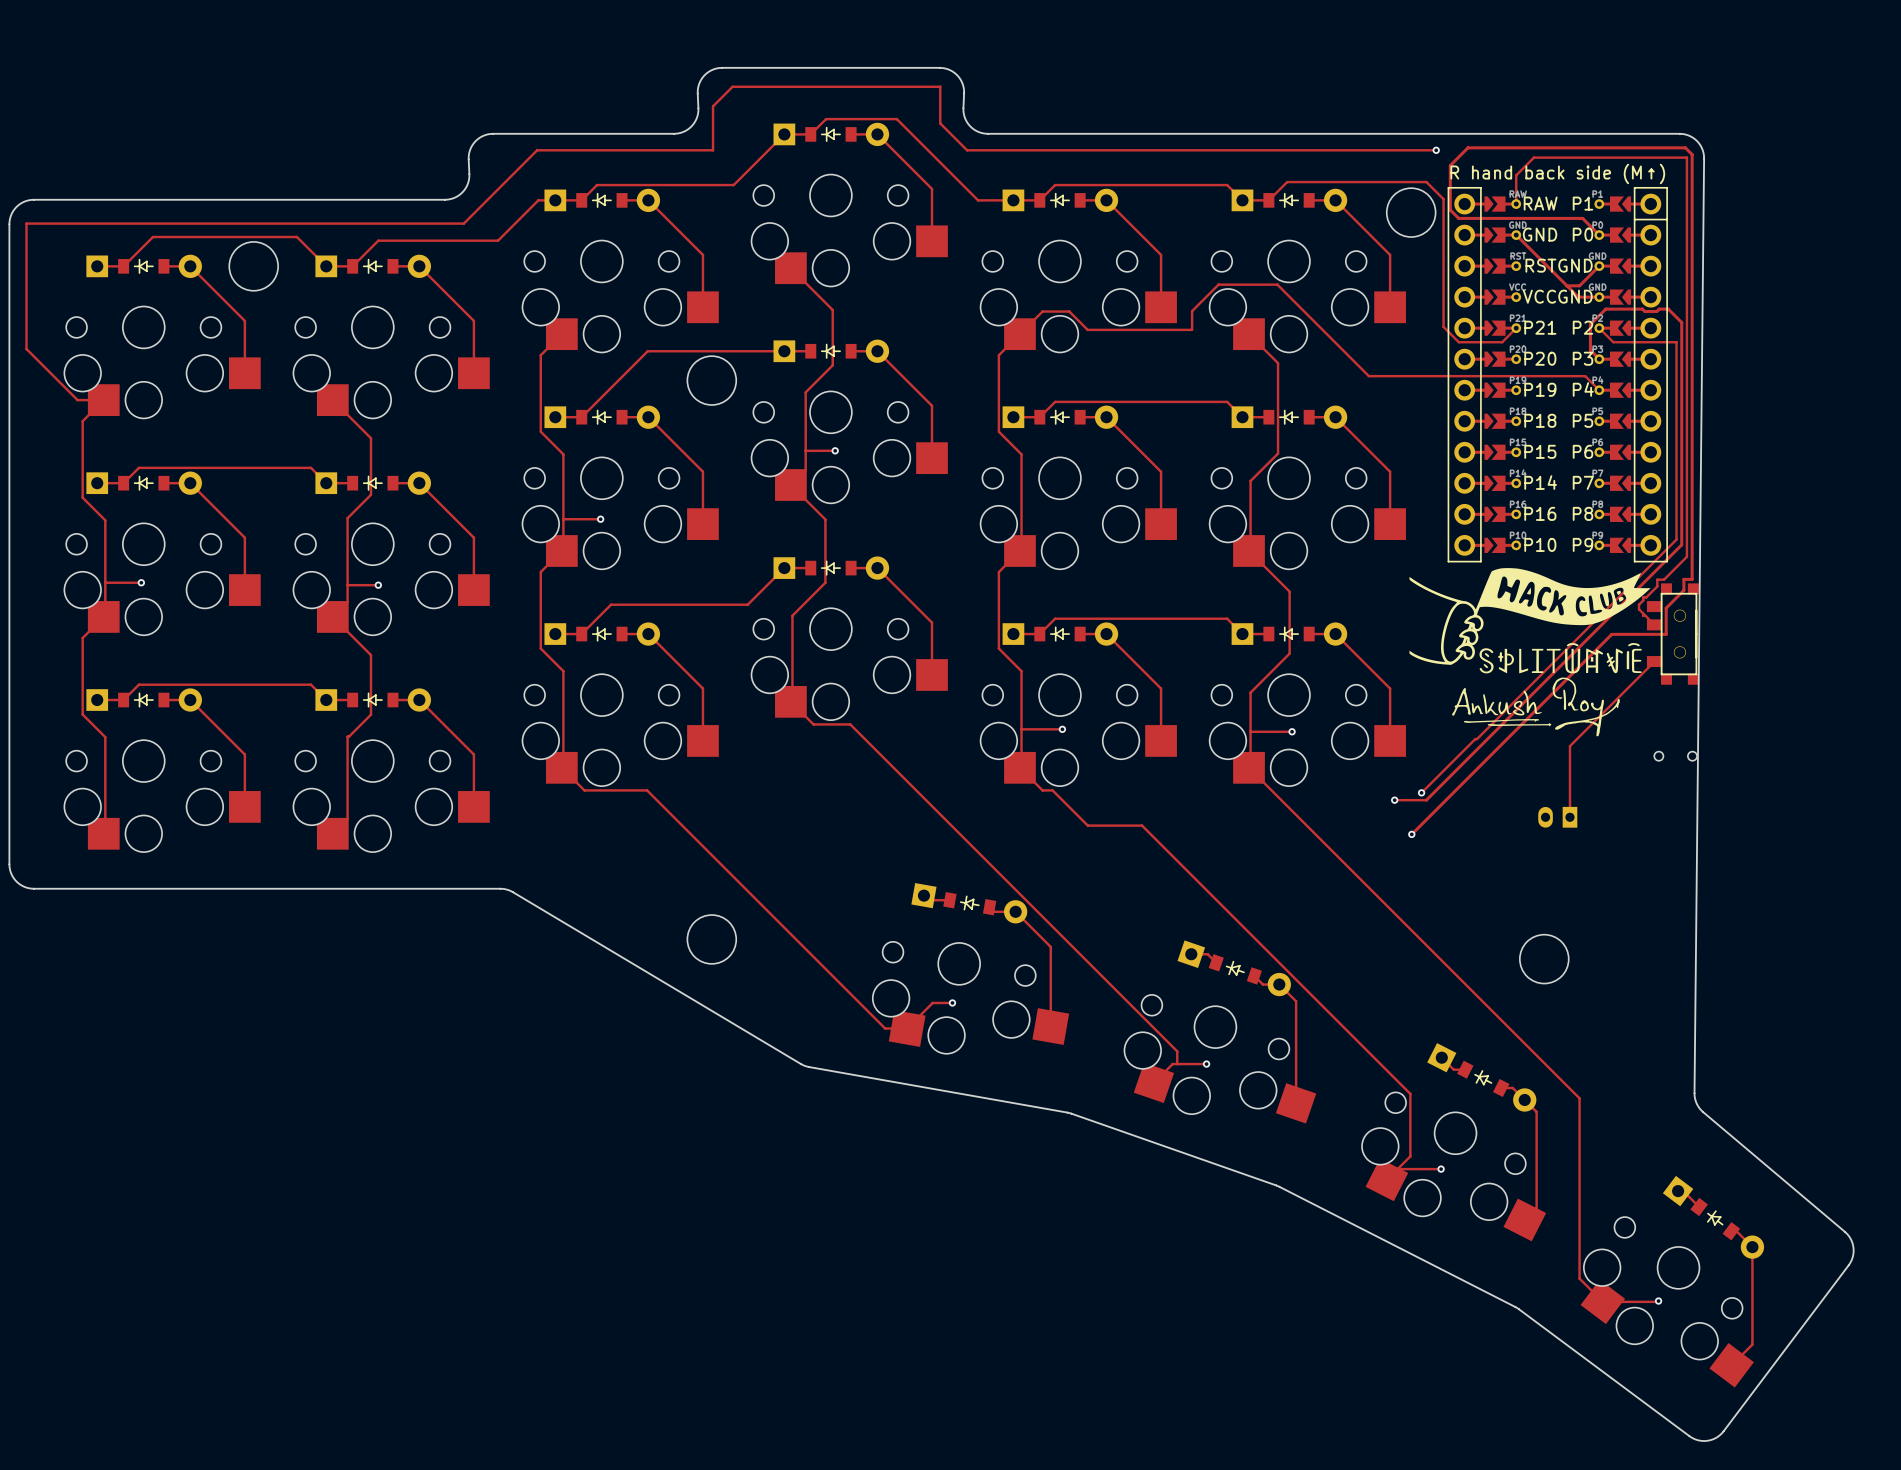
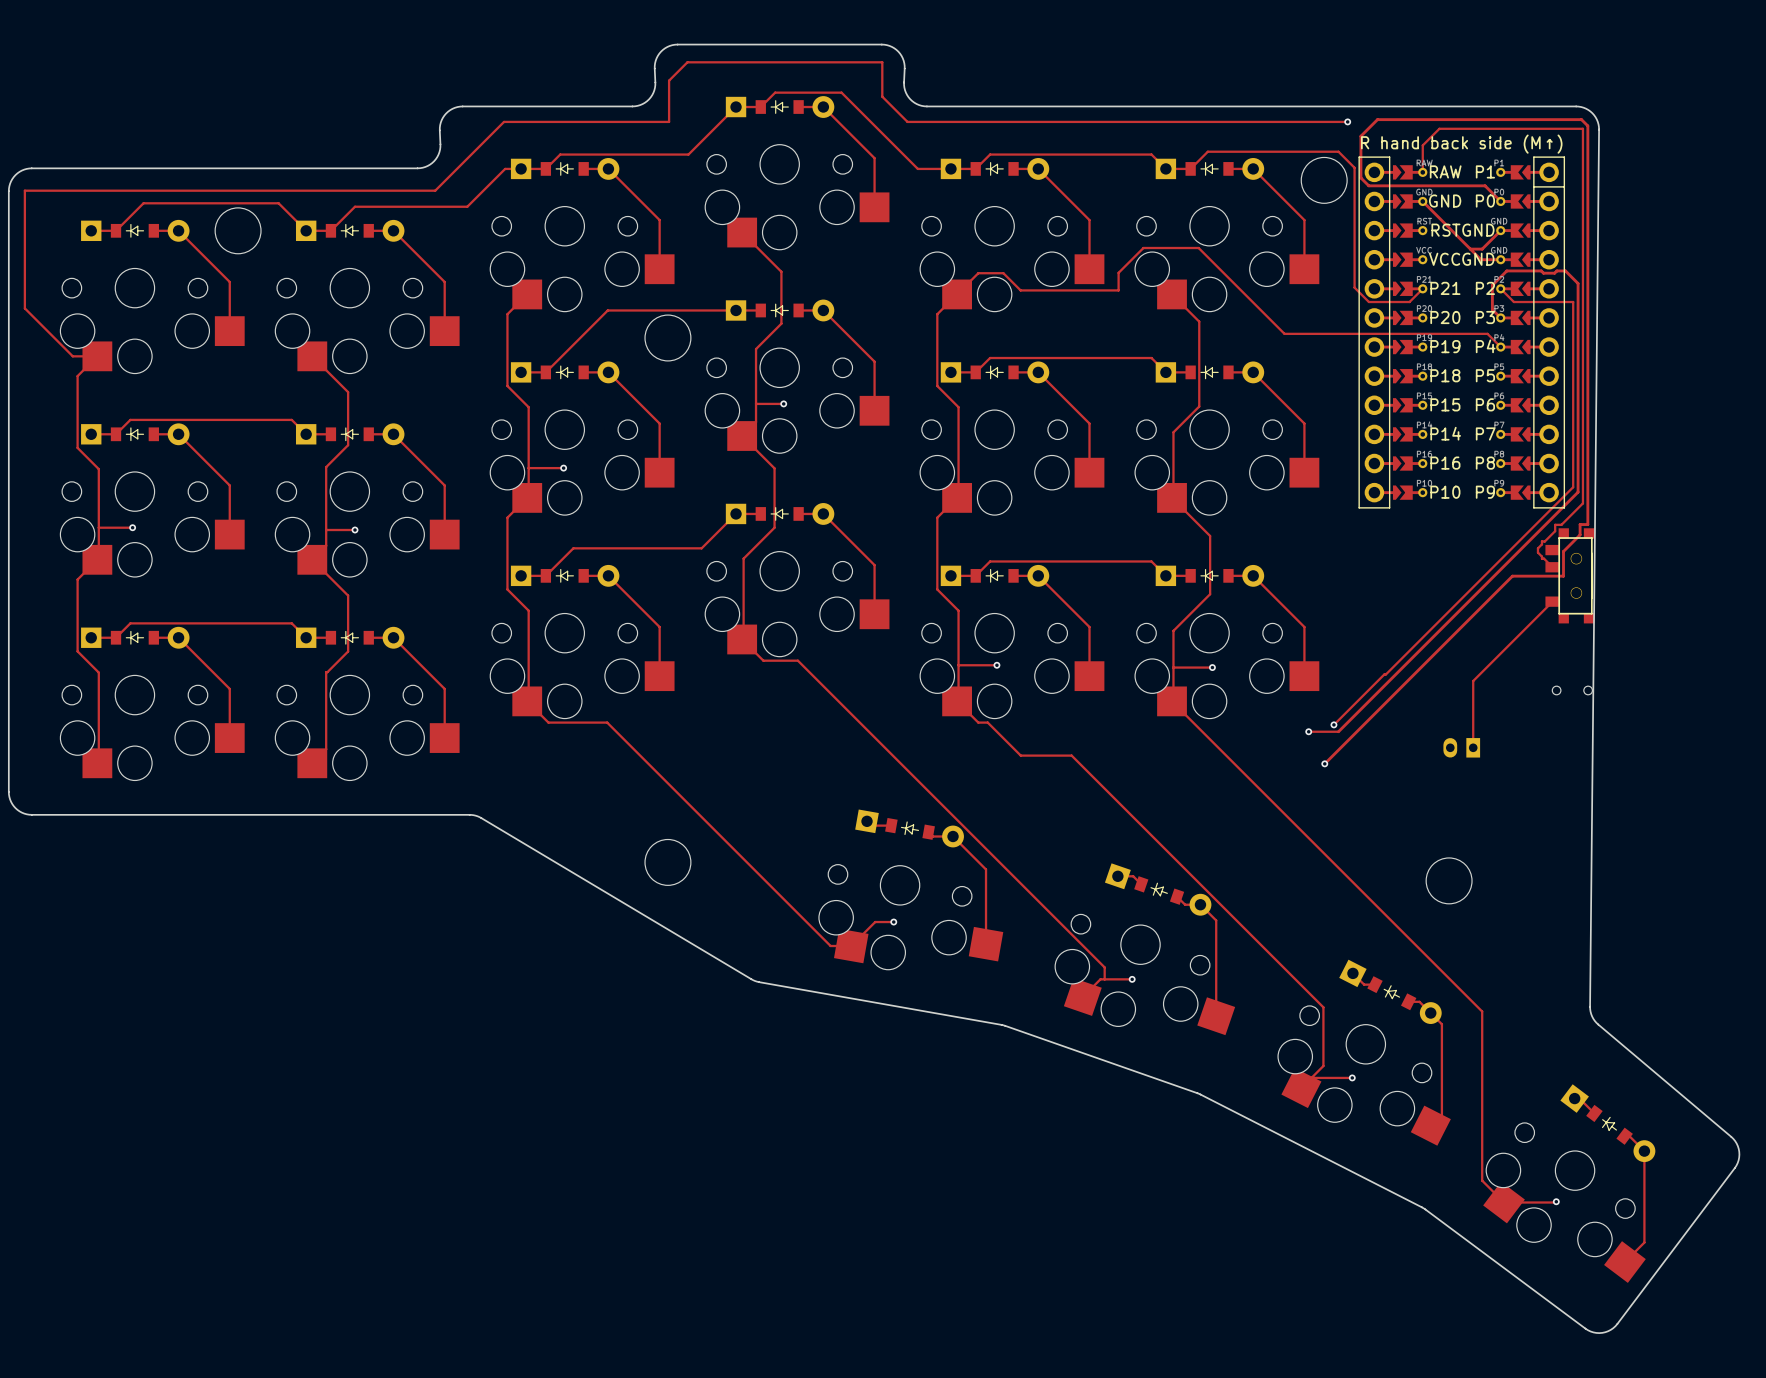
drawing: [1409, 568, 1651, 737] -> none

